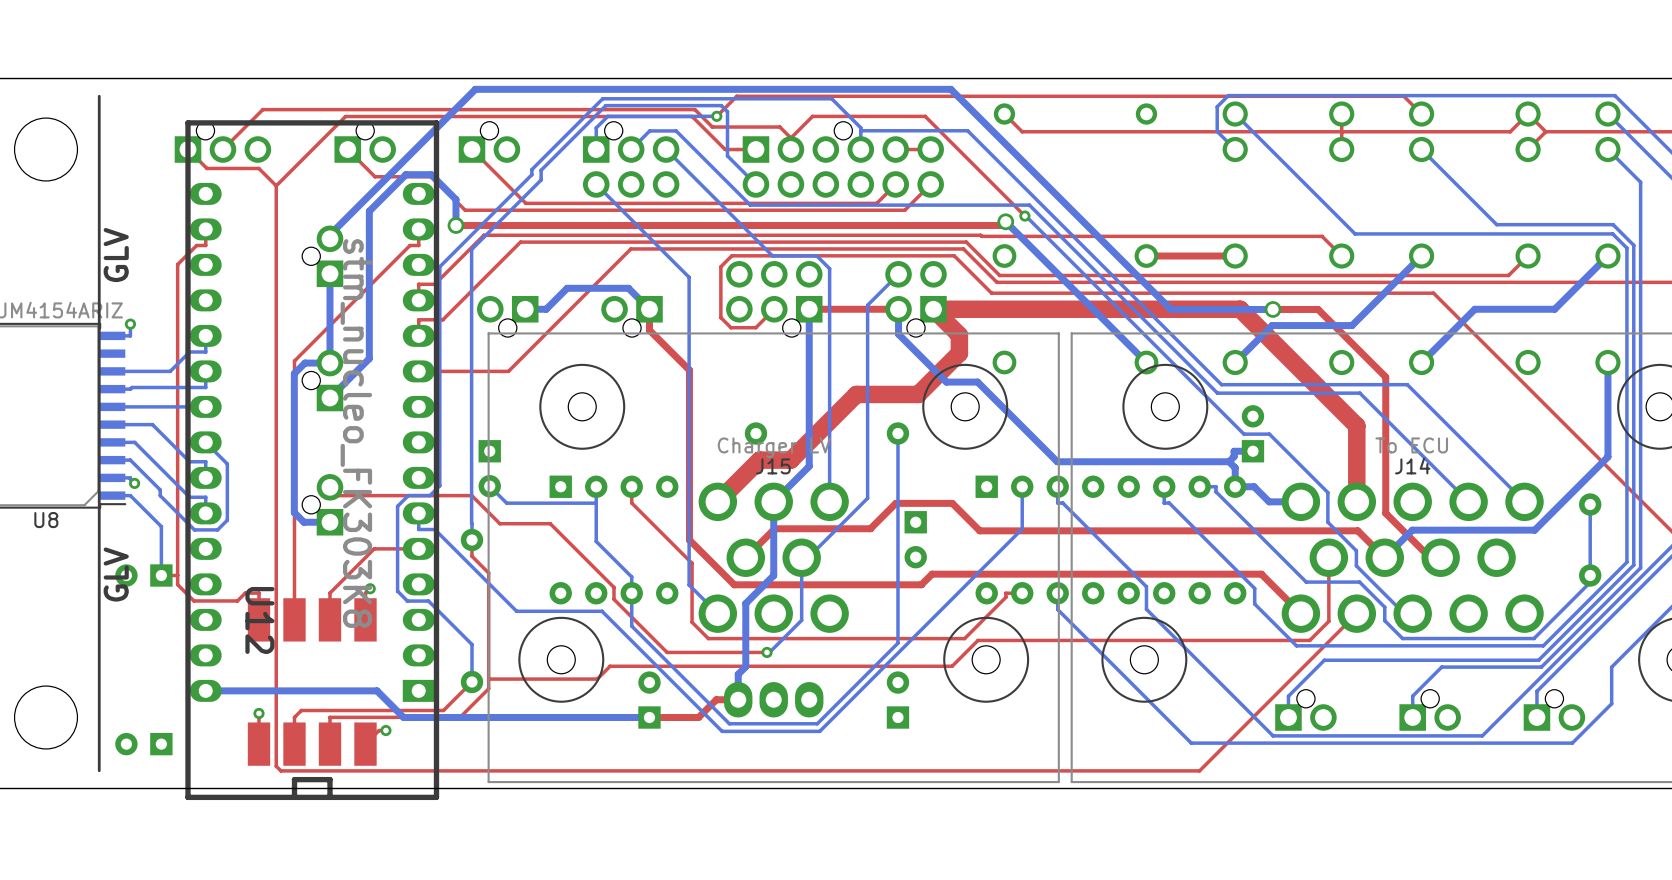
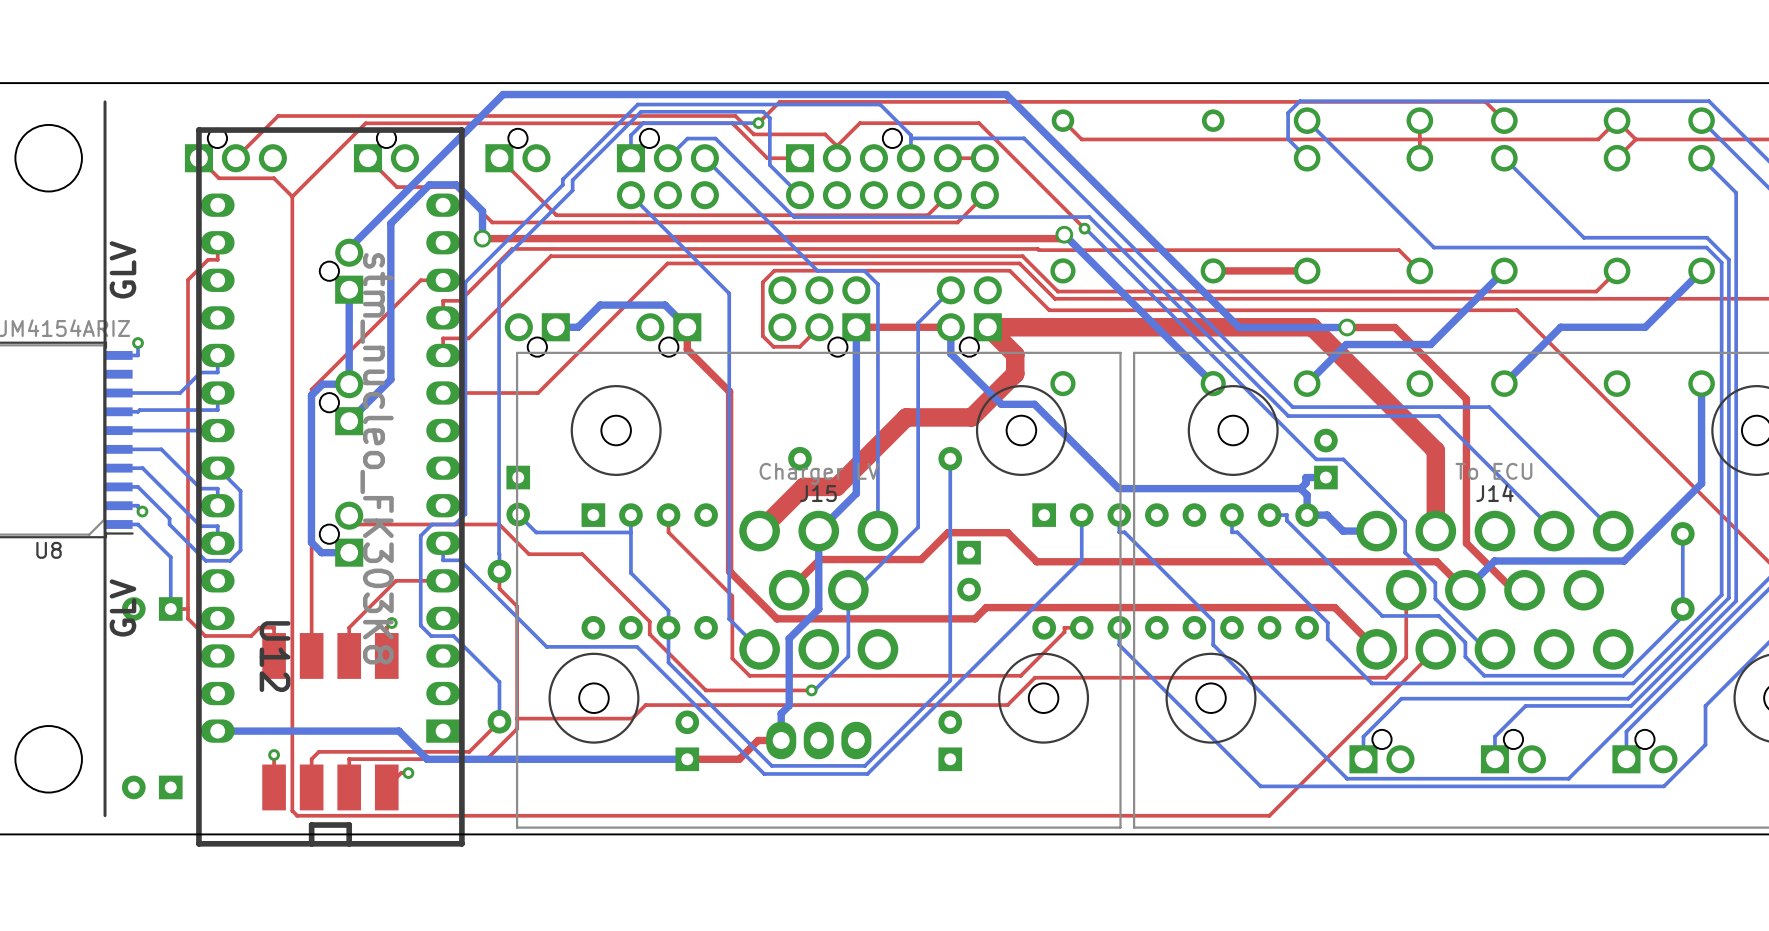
top track: (418, 229) (418, 245) (410, 245) (294, 361) (294, 368) -> (443, 280) (420, 280) (311, 389)

